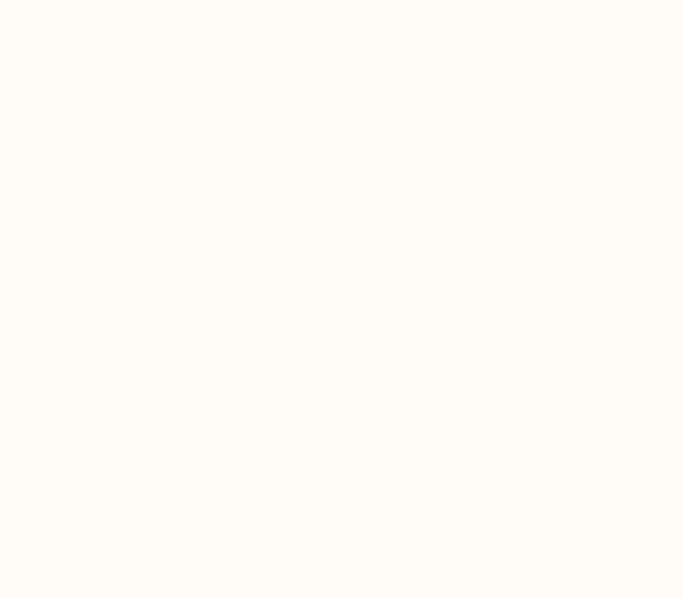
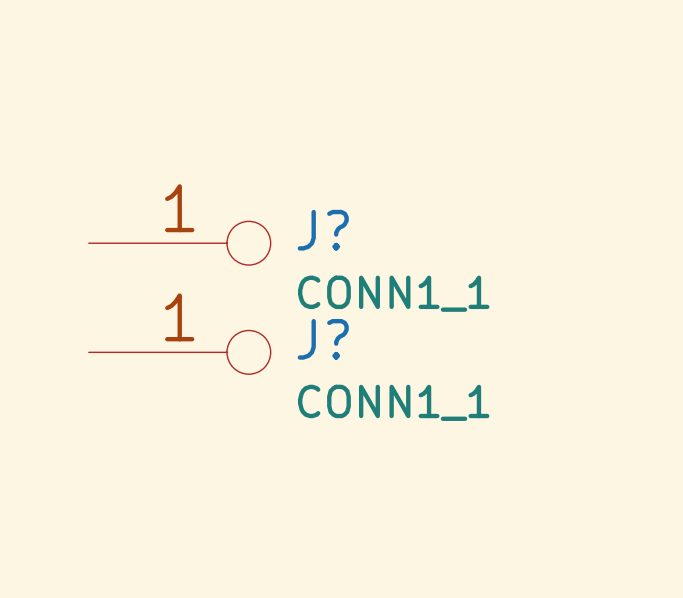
J?: none -> CONN1_1 (179, 243)
J?: none -> CONN1_1 (179, 352)

